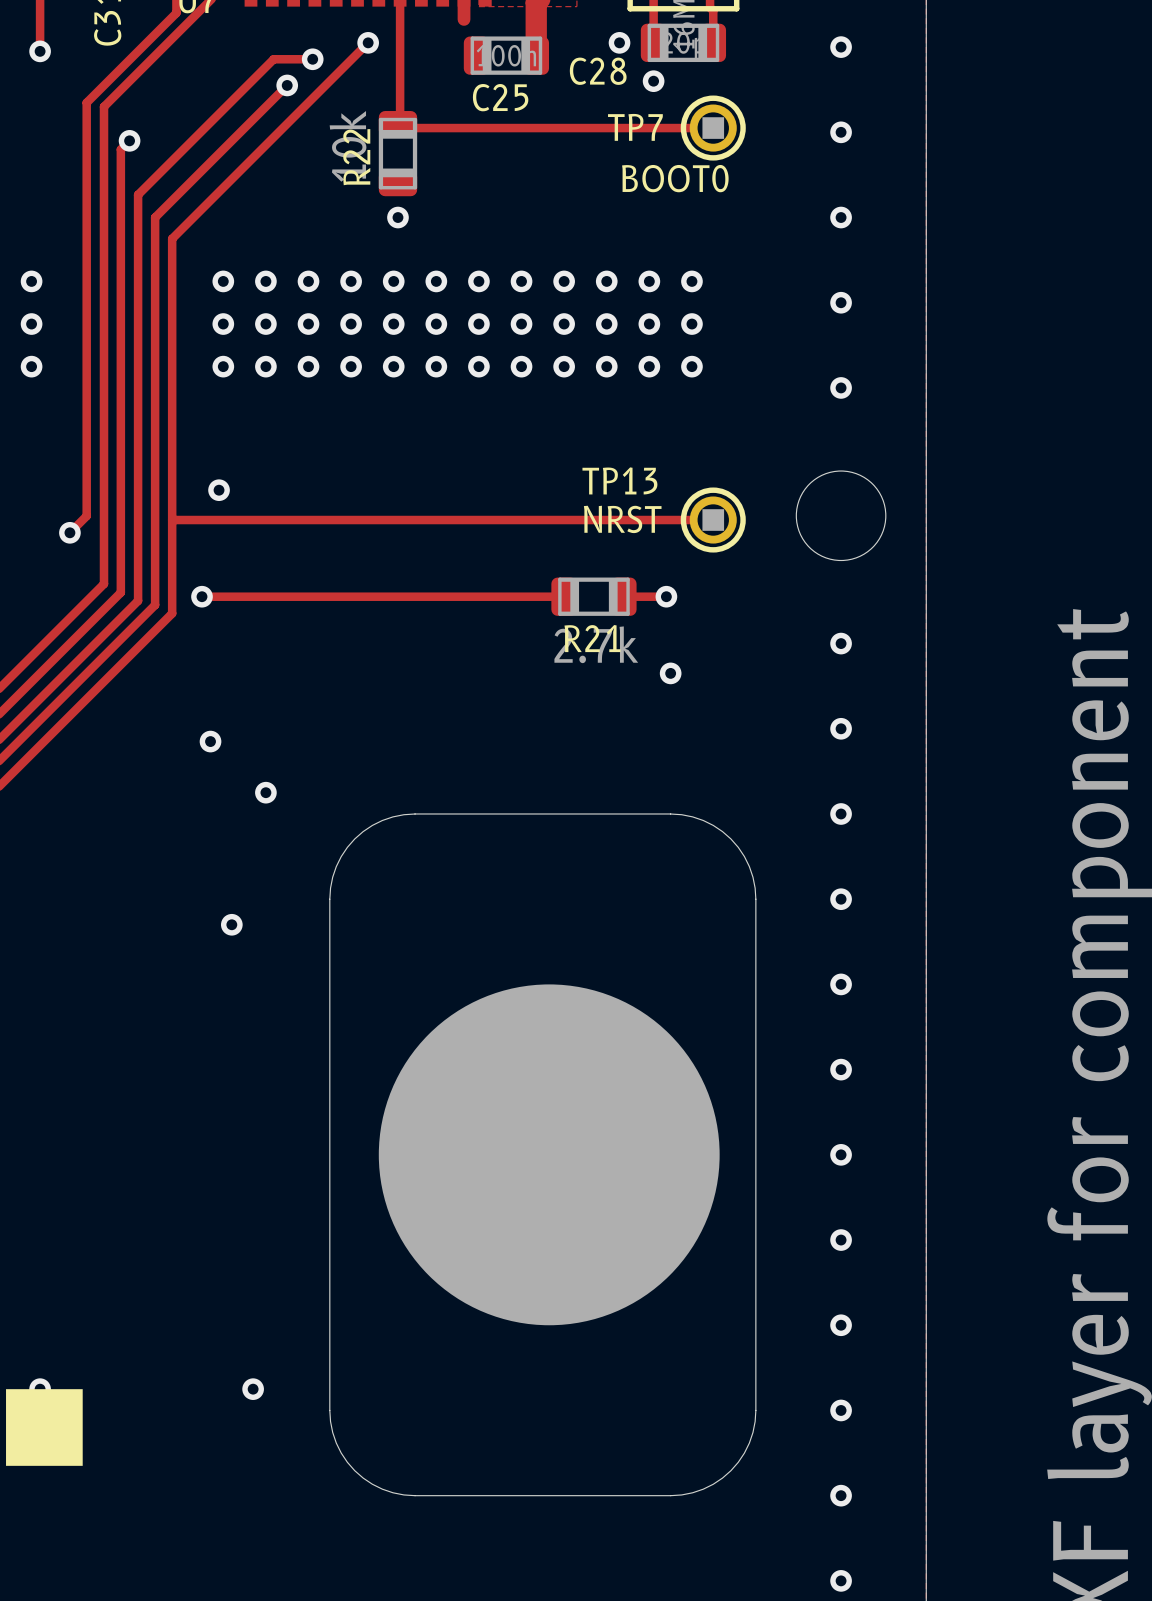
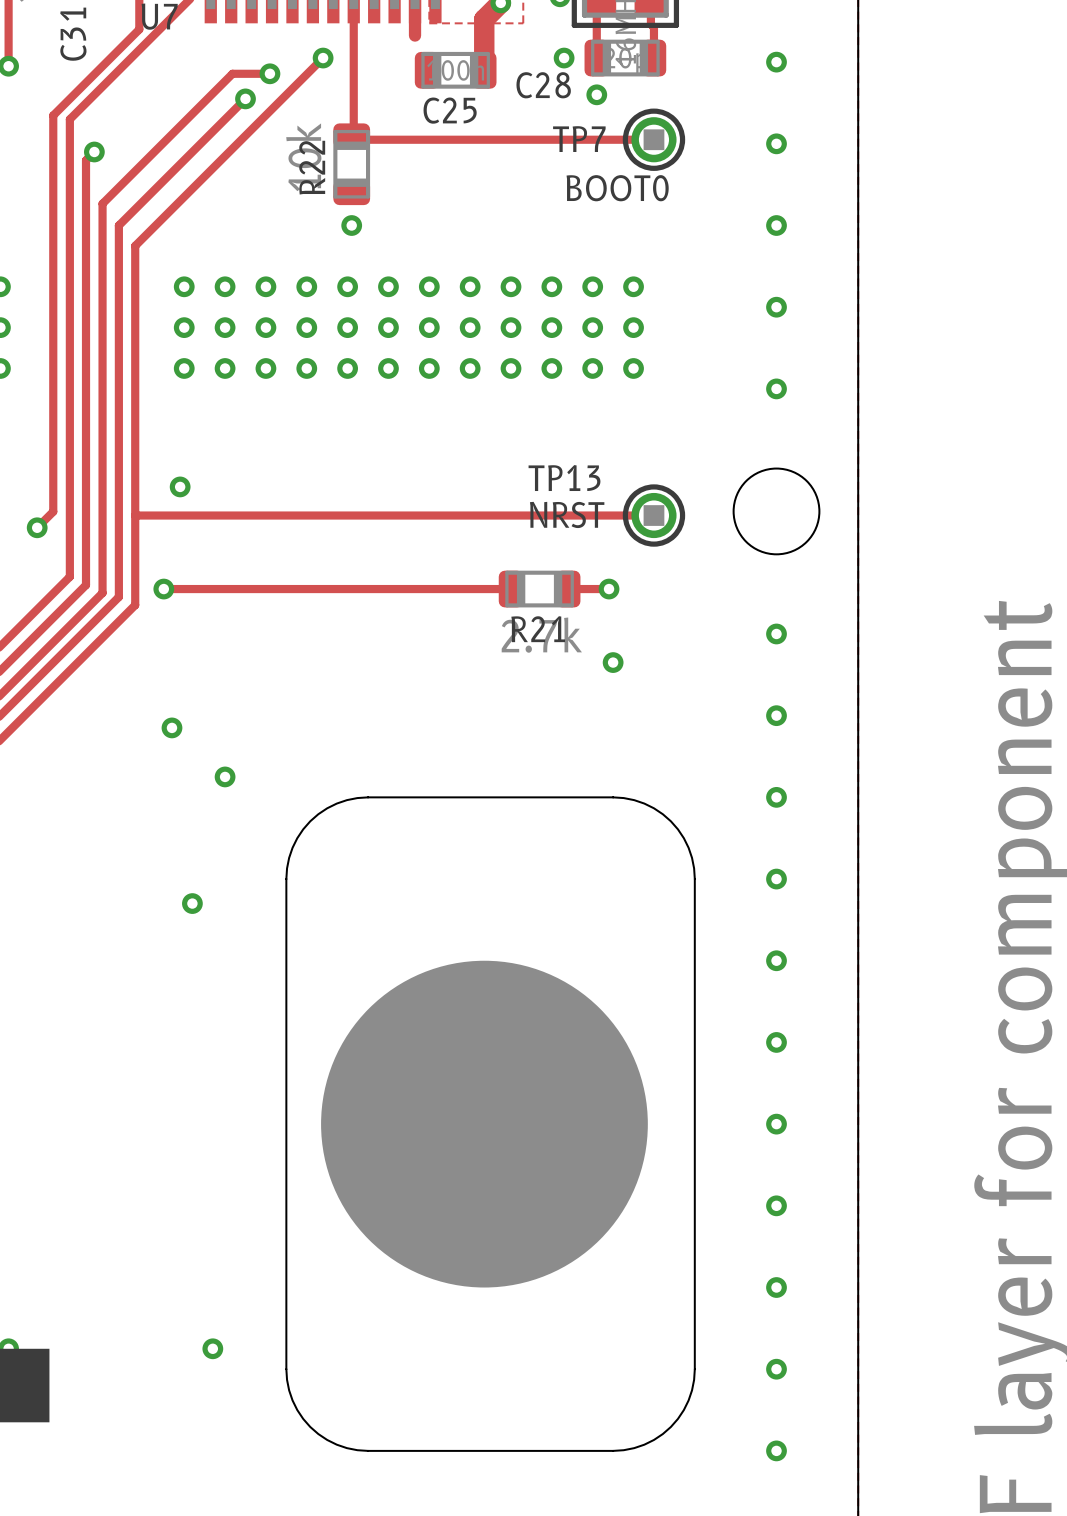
drawing position: (549, 1154) -> (484, 1124)

